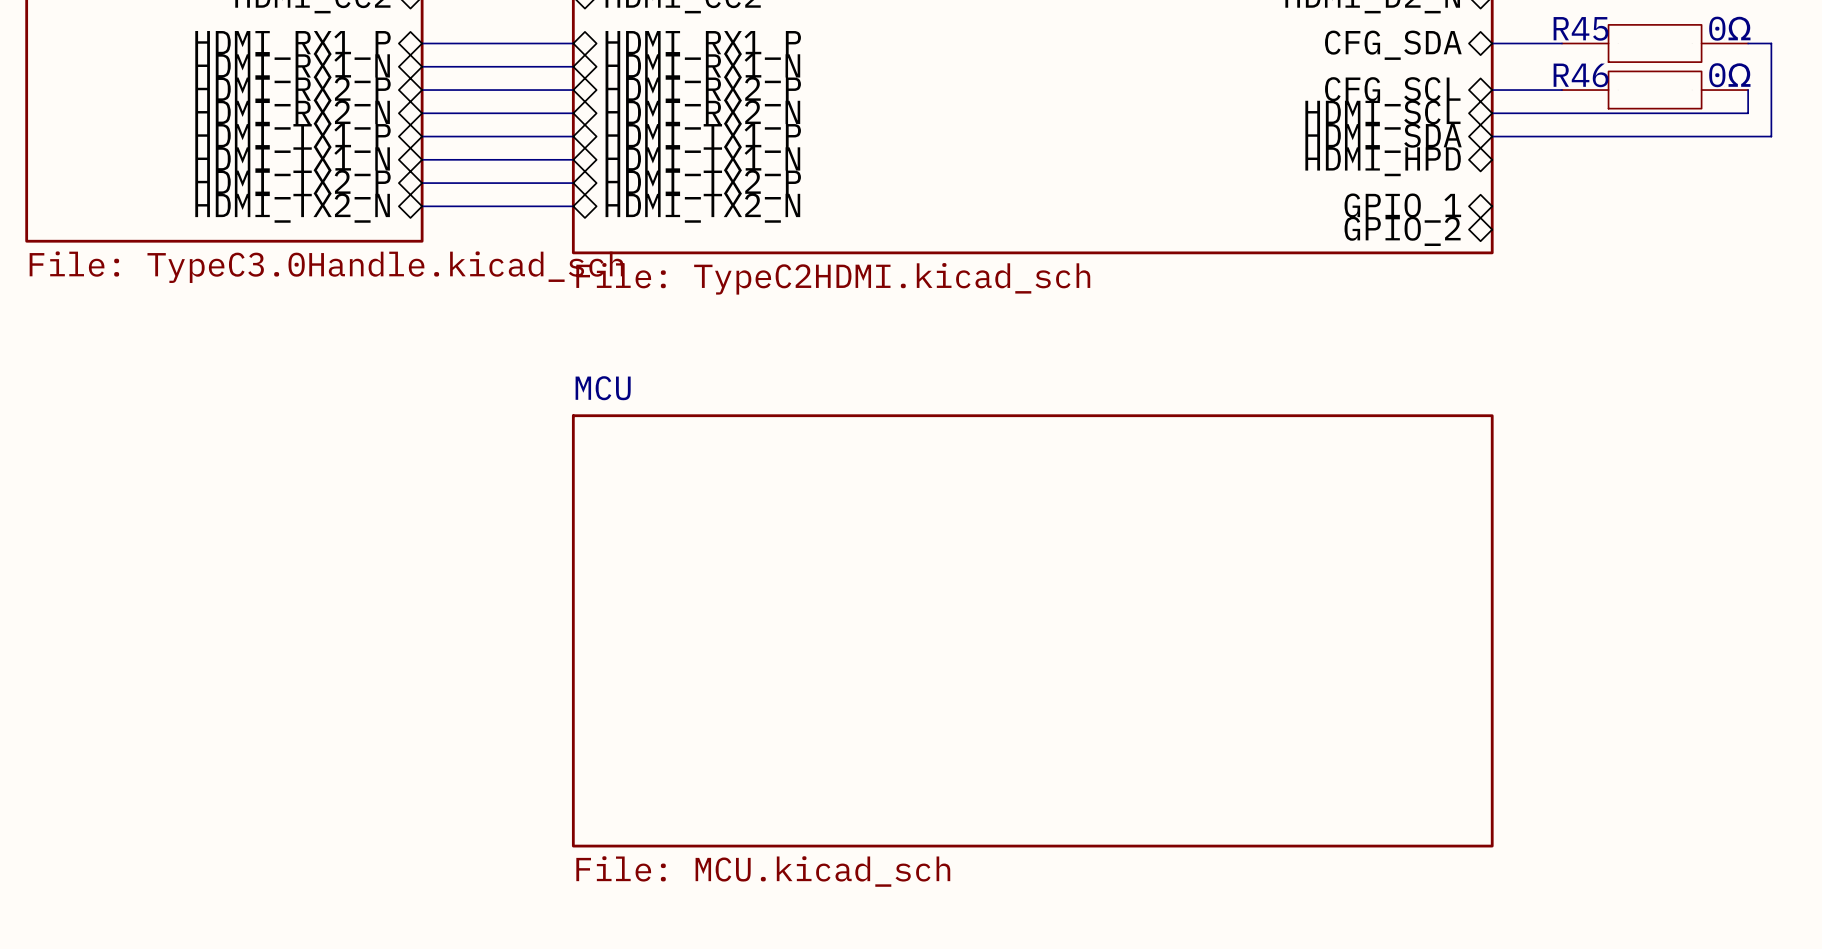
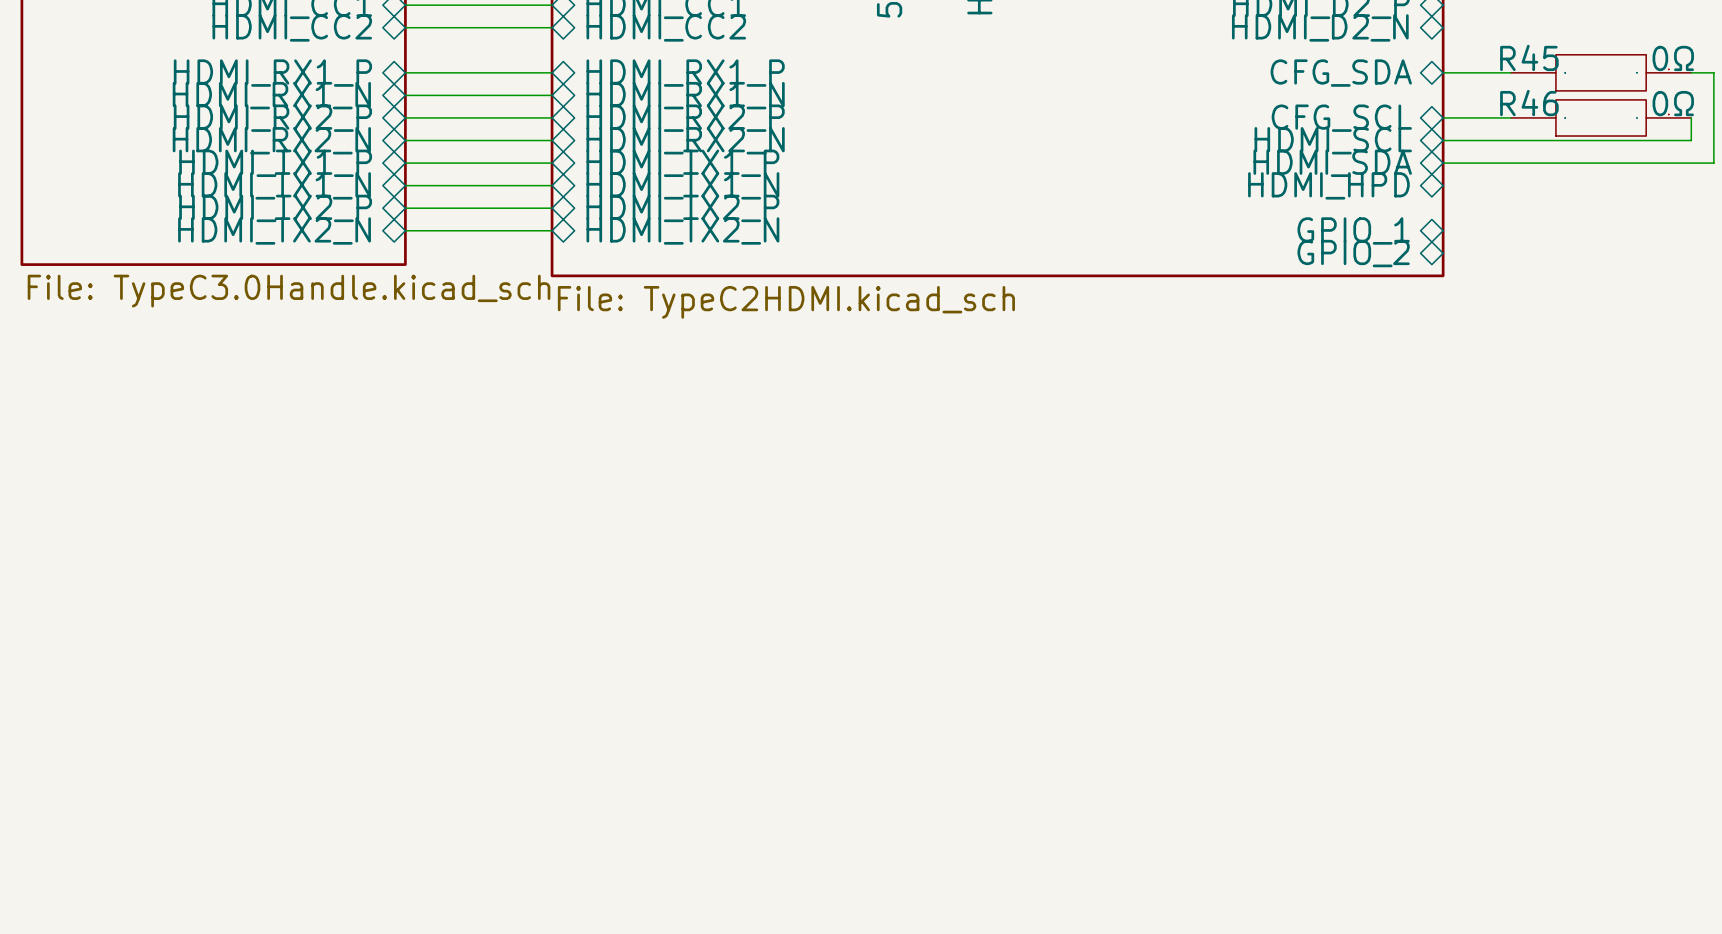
sheet MCU: File: MCU.kicad_sch (1032, 630) -> none

